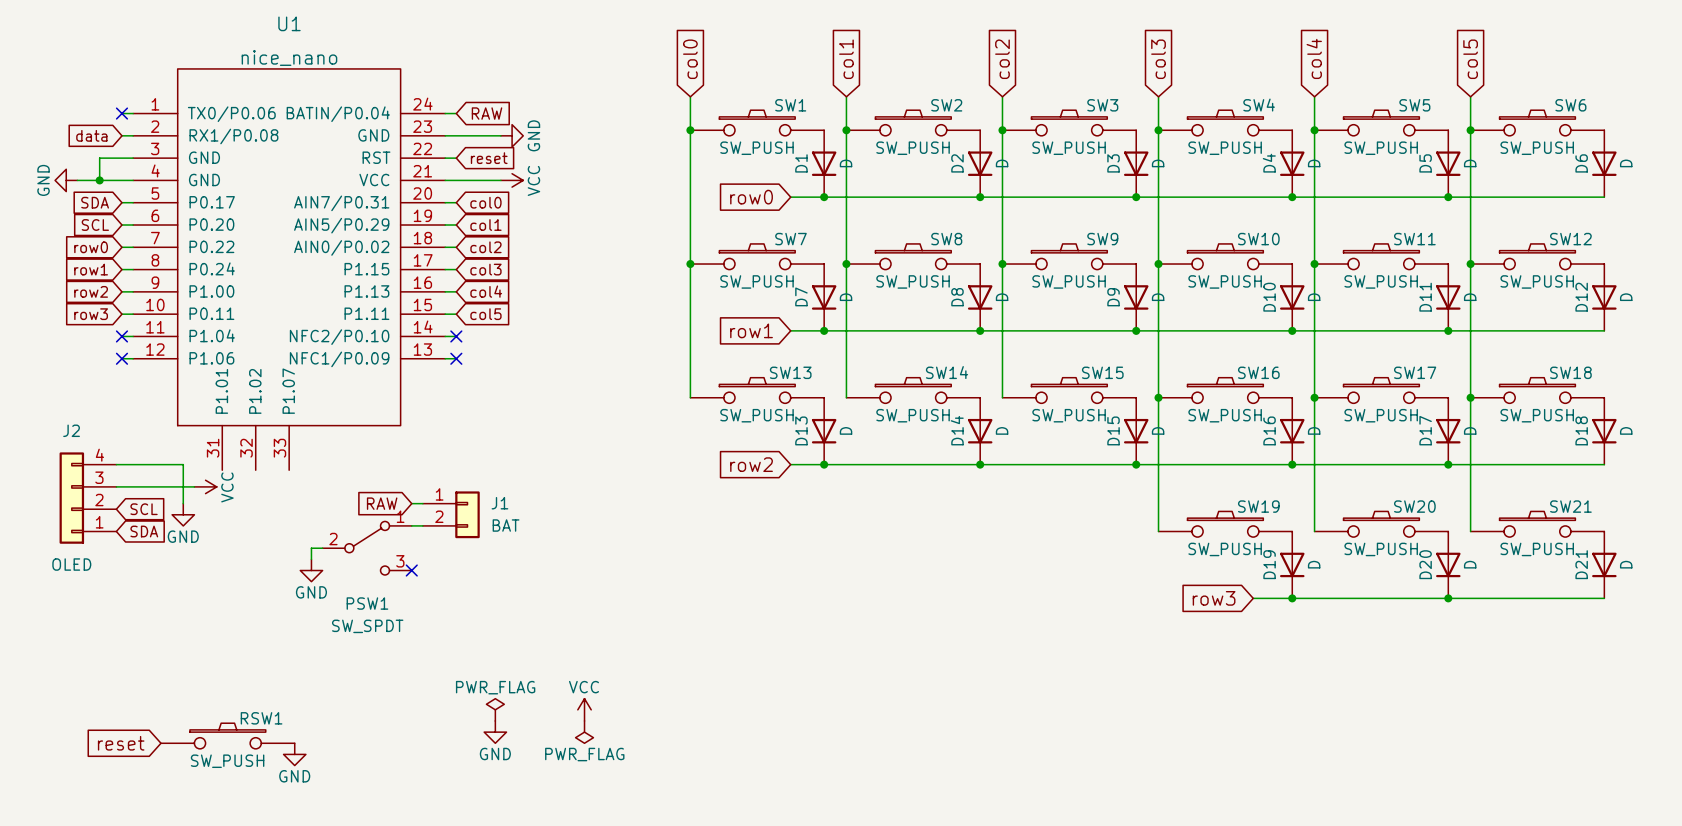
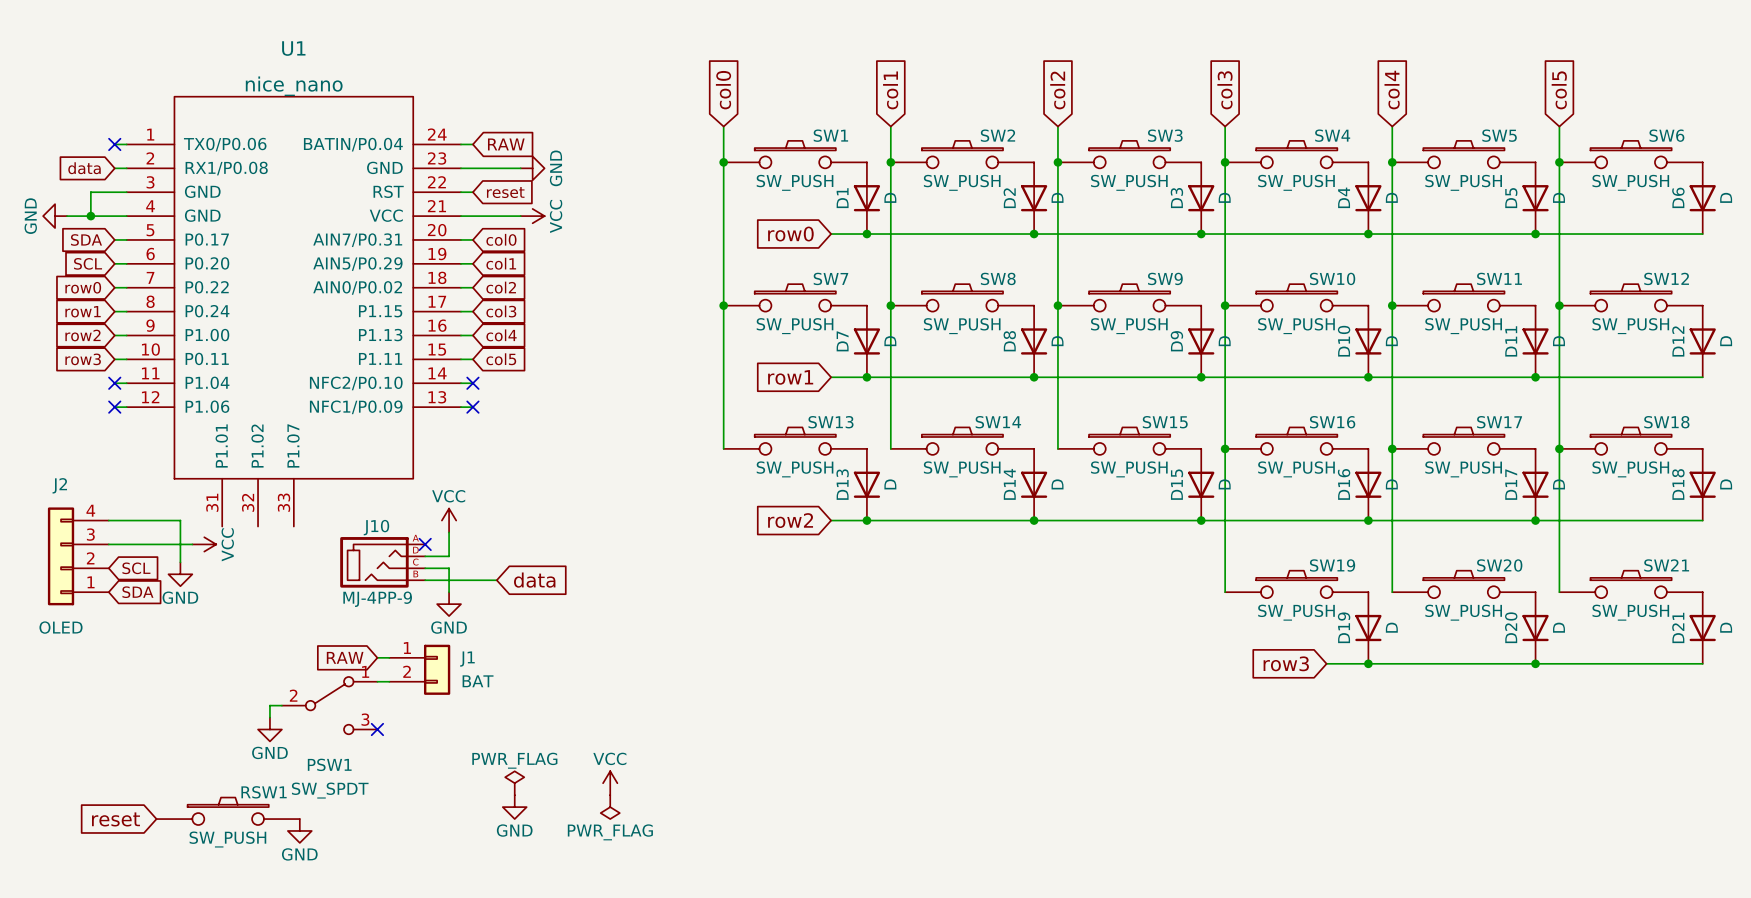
power symbol: none -> VCC (449, 520)
wire: none -> (449, 532) (449, 556) (425, 556)
no-connect mark: none -> (425, 544)
J10: none -> MJ-4PP-9 (382, 562)
global label position: RAW (382, 503) -> RAW (345, 657)
wire: (411, 503) (422, 503) -> (377, 657) (389, 657)
wire: none -> (425, 568) (449, 568) (449, 592)
J1 position: (451, 514) -> (419, 669)
wire: none -> (425, 580) (496, 580)
global label: none -> data (534, 580)
wire: (411, 525) (422, 525) -> (377, 681) (389, 681)
power symbol: none -> GND (449, 604)
wire: (322, 548) (311, 548) (311, 559) -> (281, 705) (269, 705) (269, 717)
PSW1 position: (367, 548) -> (329, 705)
power symbol: GND (311, 570) -> none
no-connect mark: (411, 570) -> none
power symbol: none -> GND (269, 729)
no-connect mark: none -> (377, 729)

